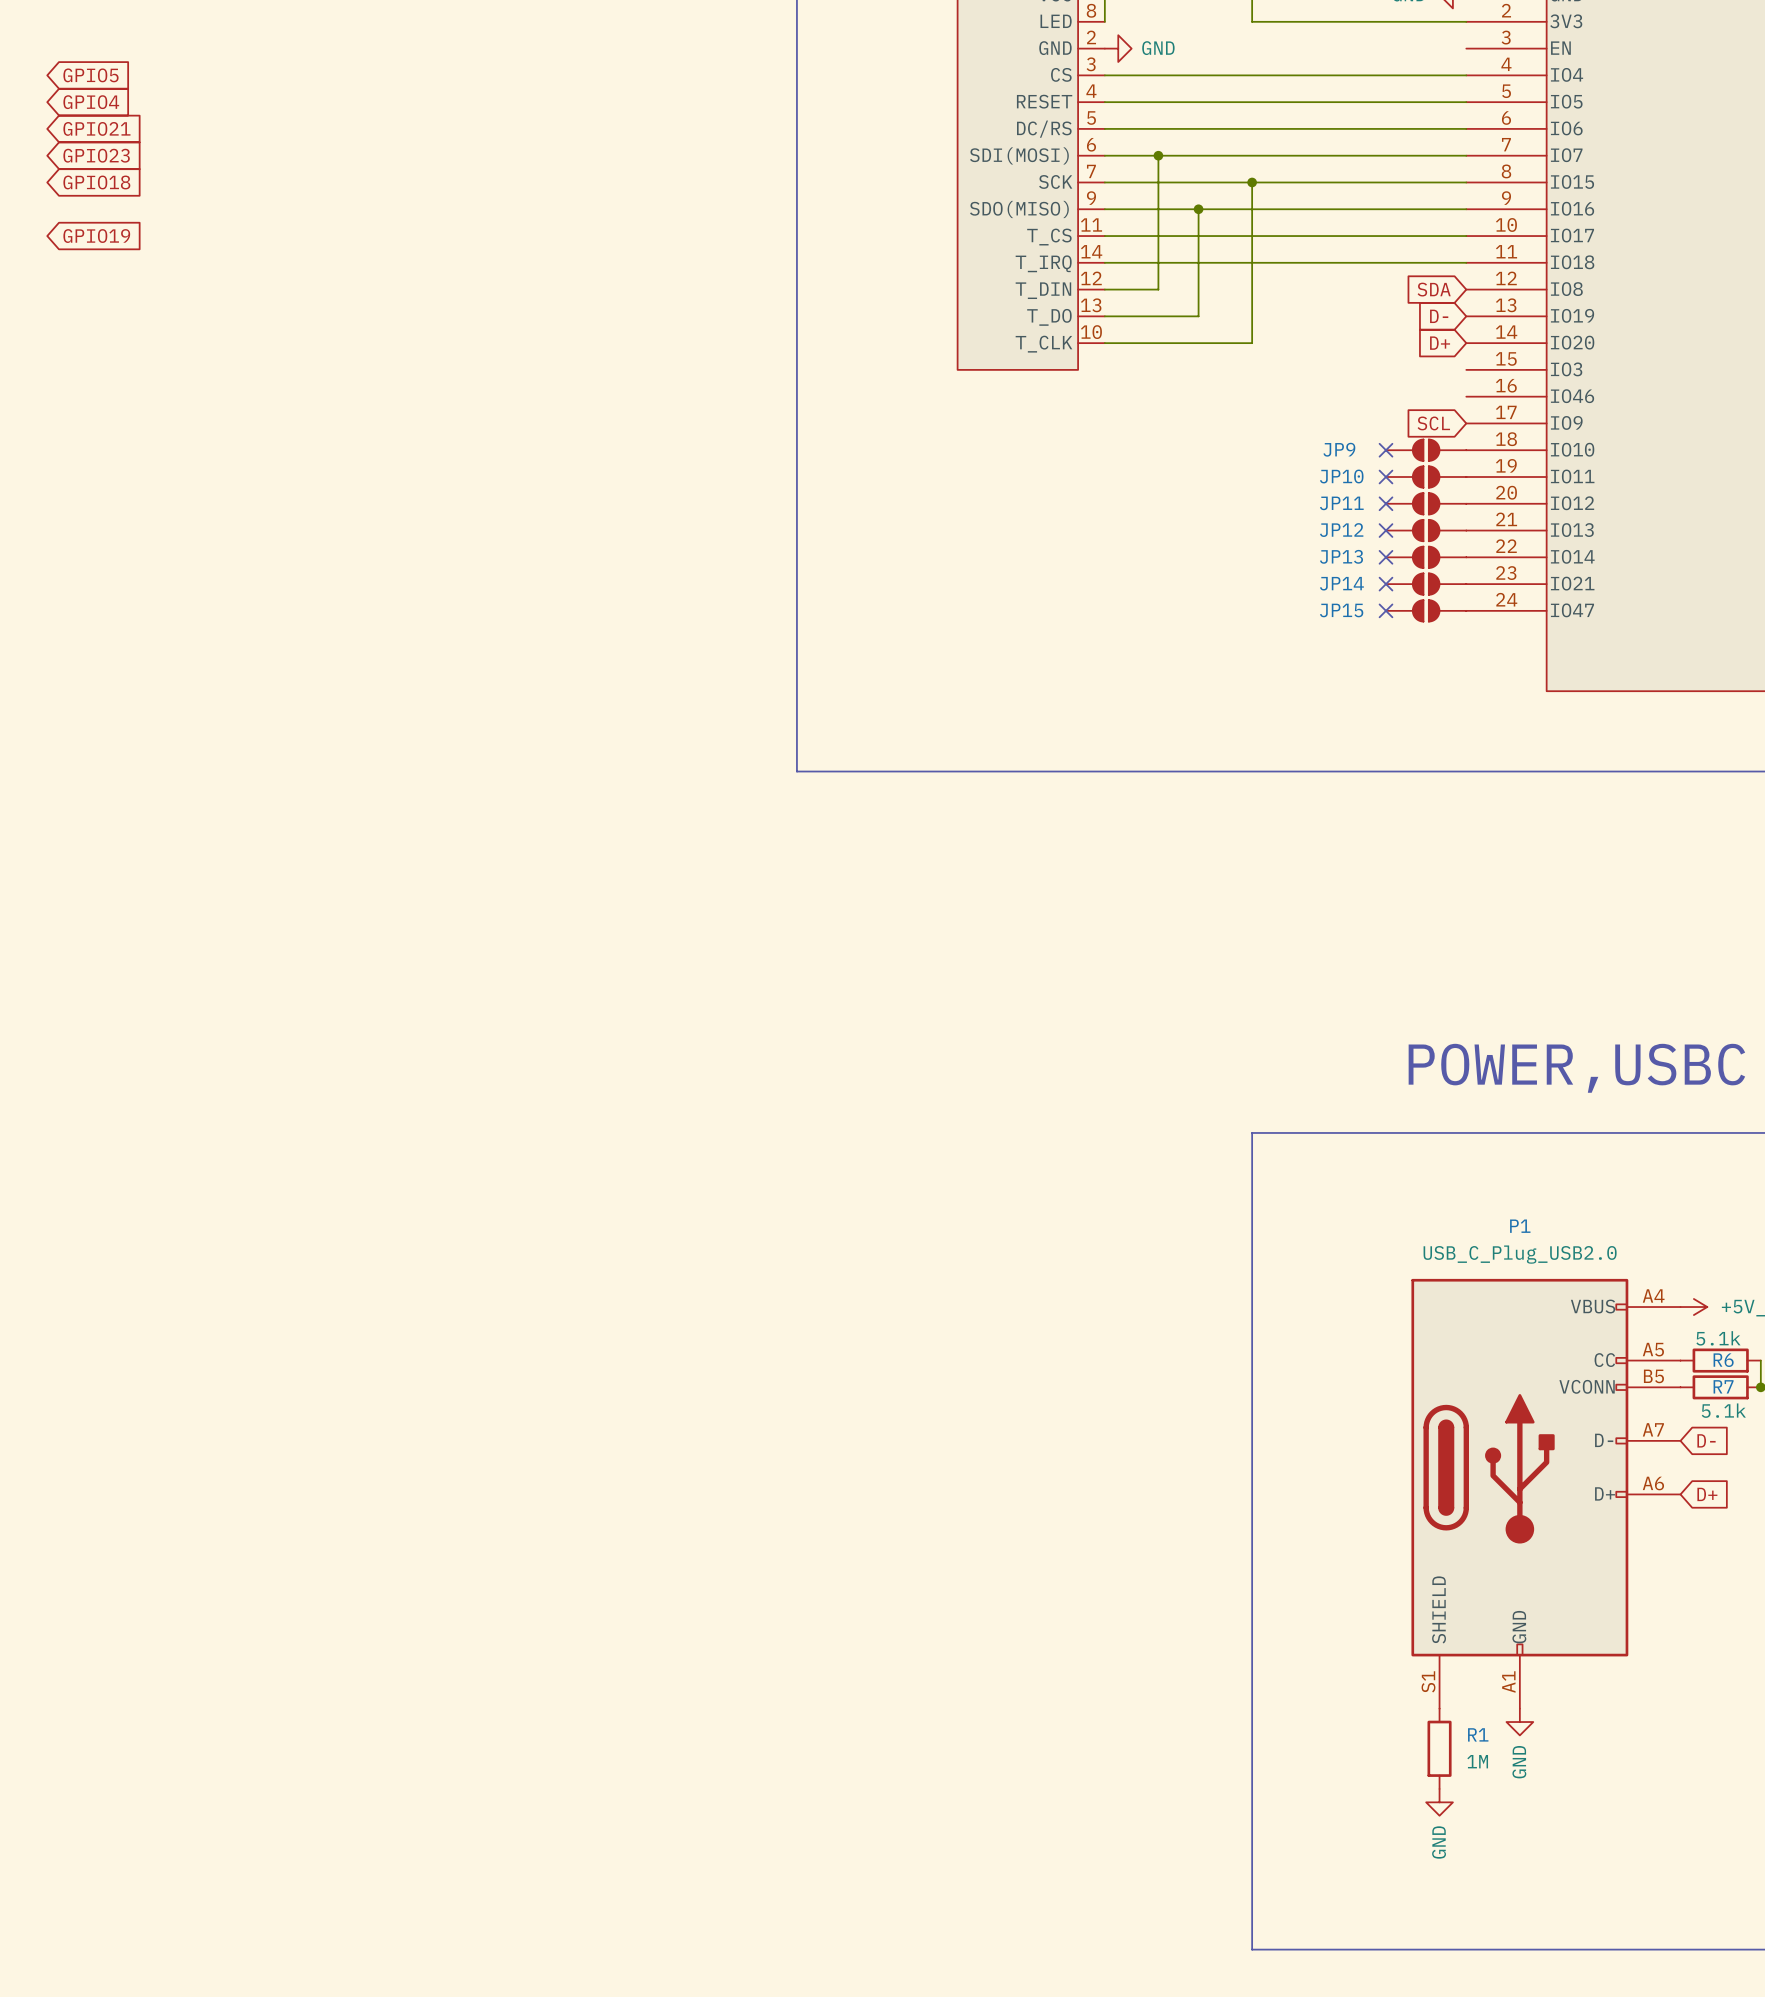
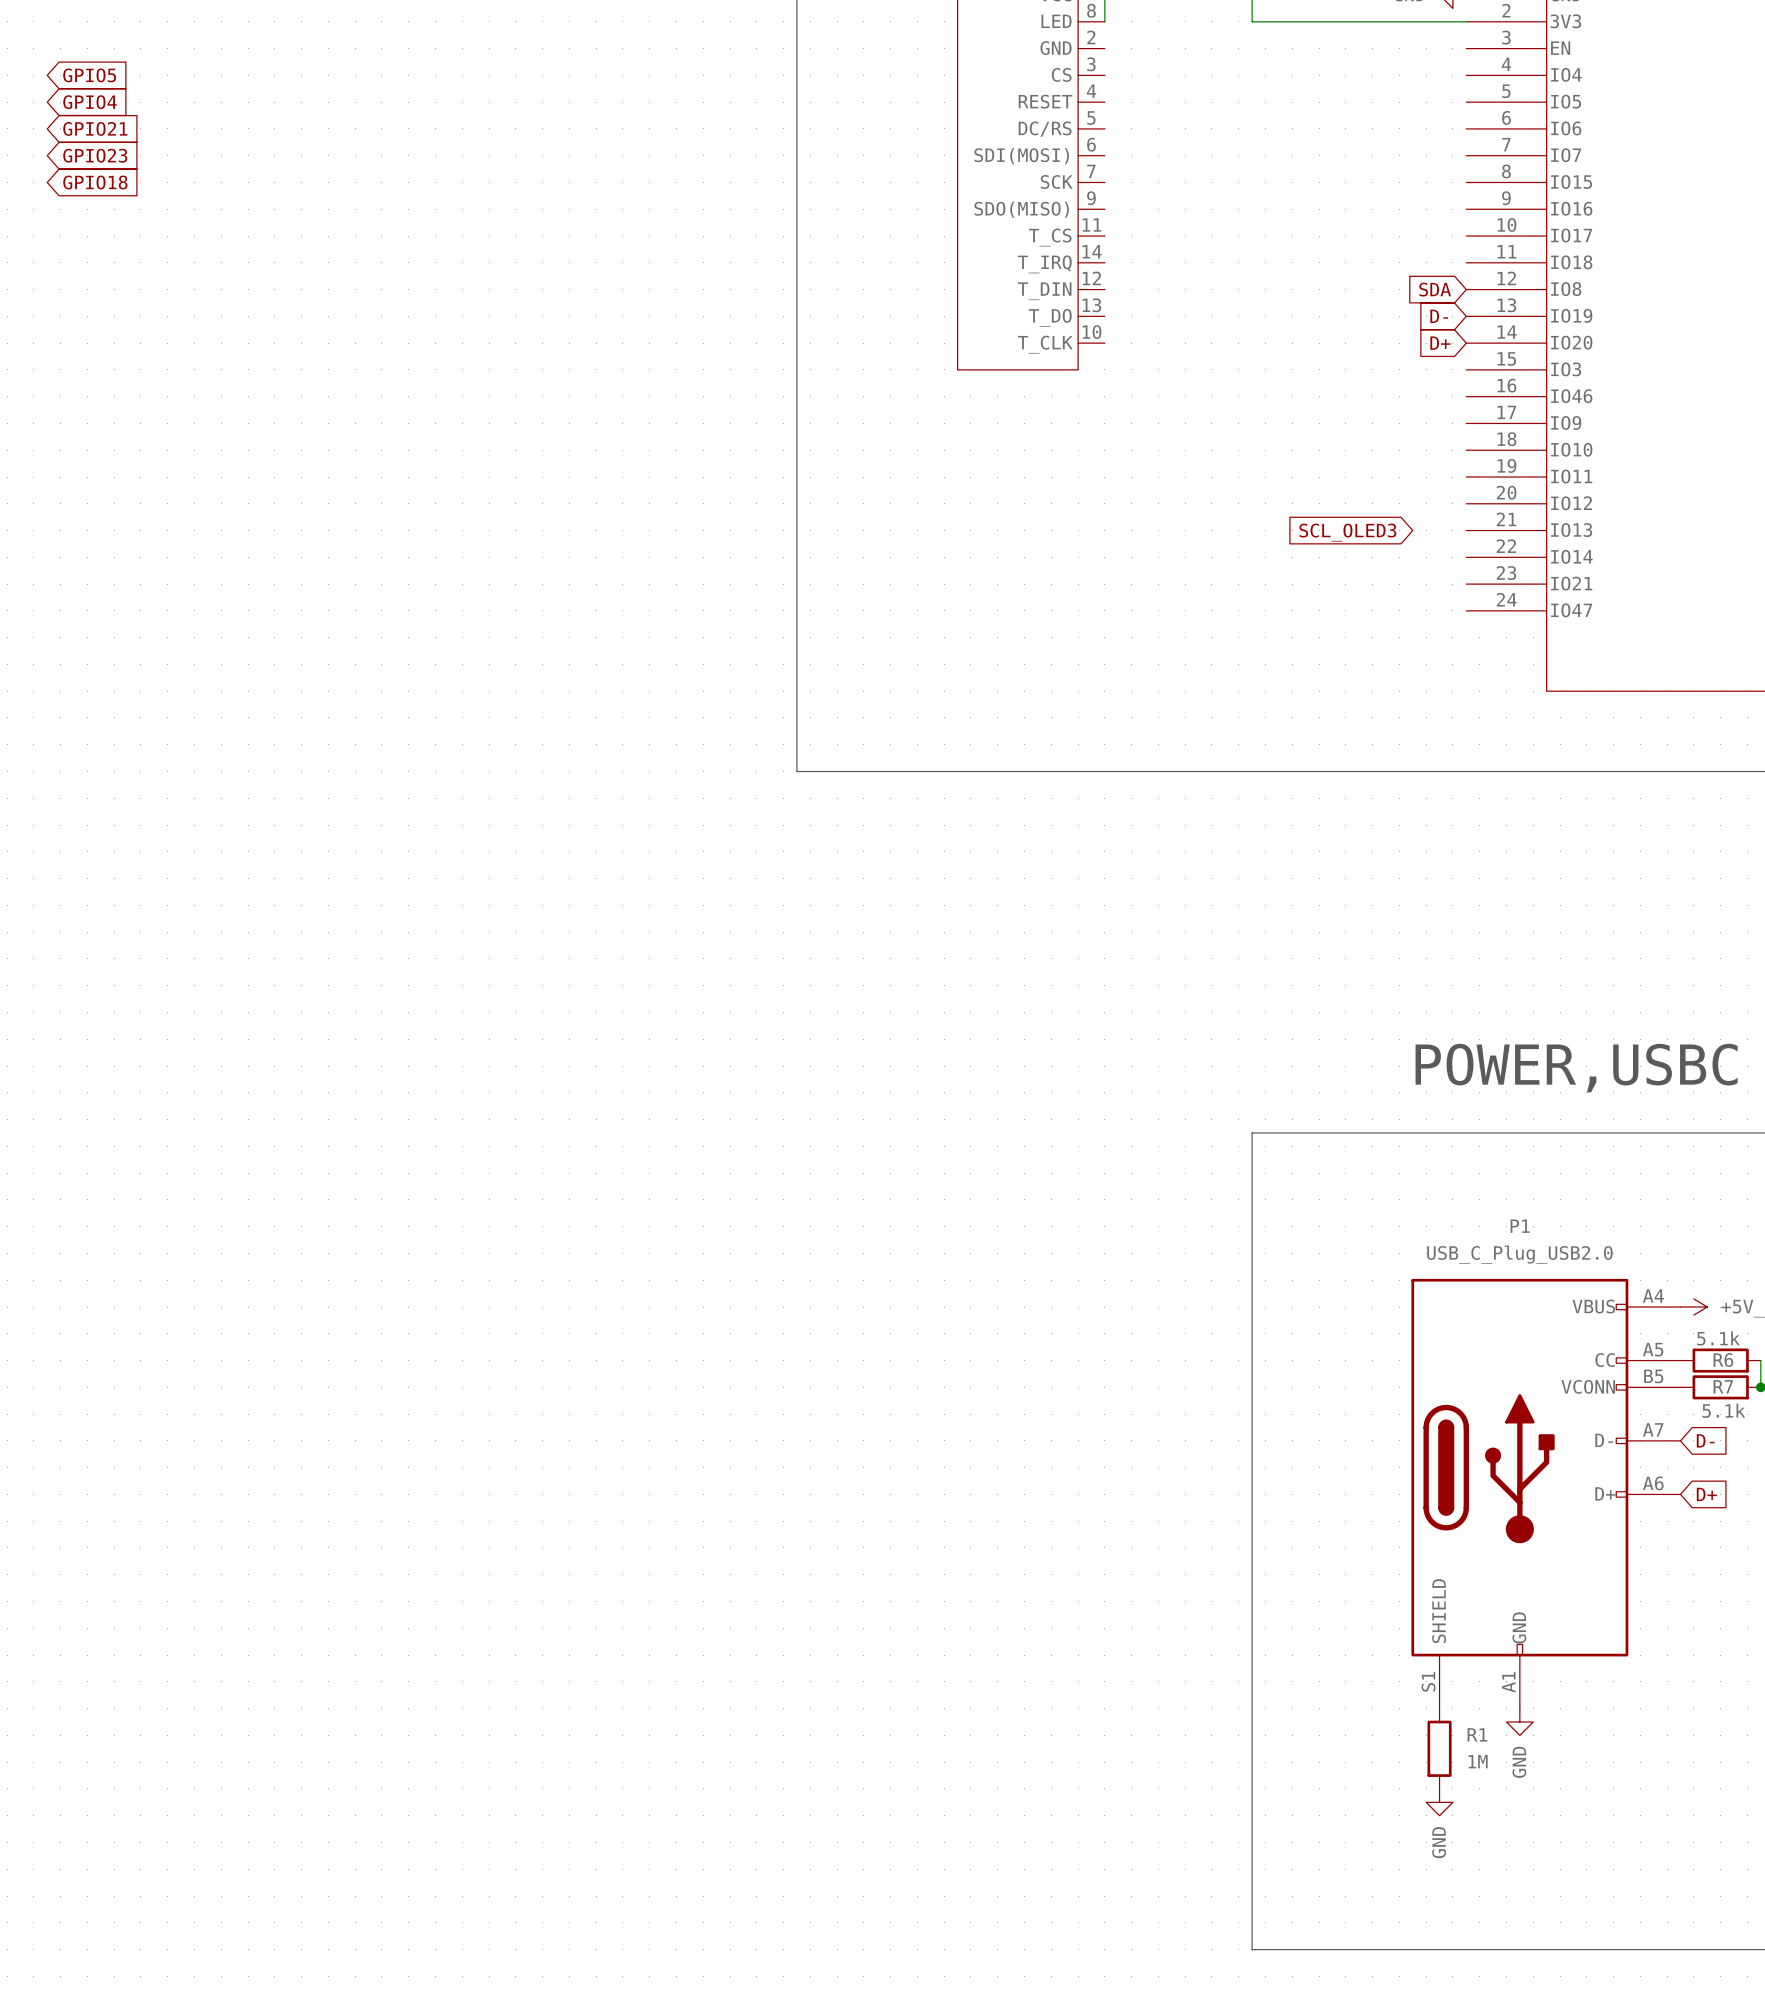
power symbol: GND (1118, 48) -> none
wire: (1104, 75) (1466, 75) -> none
wire: (1104, 102) (1466, 102) -> none
wire: (1104, 128) (1466, 128) -> none
wire: (1104, 155) (1466, 155) -> none
wire: (1158, 155) (1158, 289) (1104, 289) -> none
junction: (1158, 155) -> none
wire: (1104, 182) (1466, 182) -> none
wire: (1252, 182) (1252, 343) (1104, 343) -> none
junction: (1252, 182) -> none
wire: (1104, 209) (1466, 209) -> none
wire: (1198, 209) (1198, 316) (1104, 316) -> none
junction: (1198, 209) -> none
global label: GPIO19 (96, 236) -> none
wire: (1104, 236) (1466, 236) -> none
wire: (1104, 262) (1466, 262) -> none
global label: SCL (1433, 423) -> none
no-connect mark: (1385, 450) -> none
JP9: (1426, 450) -> none
no-connect mark: (1385, 477) -> none
JP10: (1426, 477) -> none
no-connect mark: (1385, 503) -> none
JP11: (1426, 503) -> none
no-connect mark: (1385, 530) -> none
JP12: (1426, 530) -> none
global label: none -> SCL_OLED3 (1347, 532)
no-connect mark: (1385, 557) -> none
JP13: (1426, 557) -> none
no-connect mark: (1385, 584) -> none
JP14: (1426, 584) -> none
no-connect mark: (1385, 610) -> none
JP15: (1426, 610) -> none

